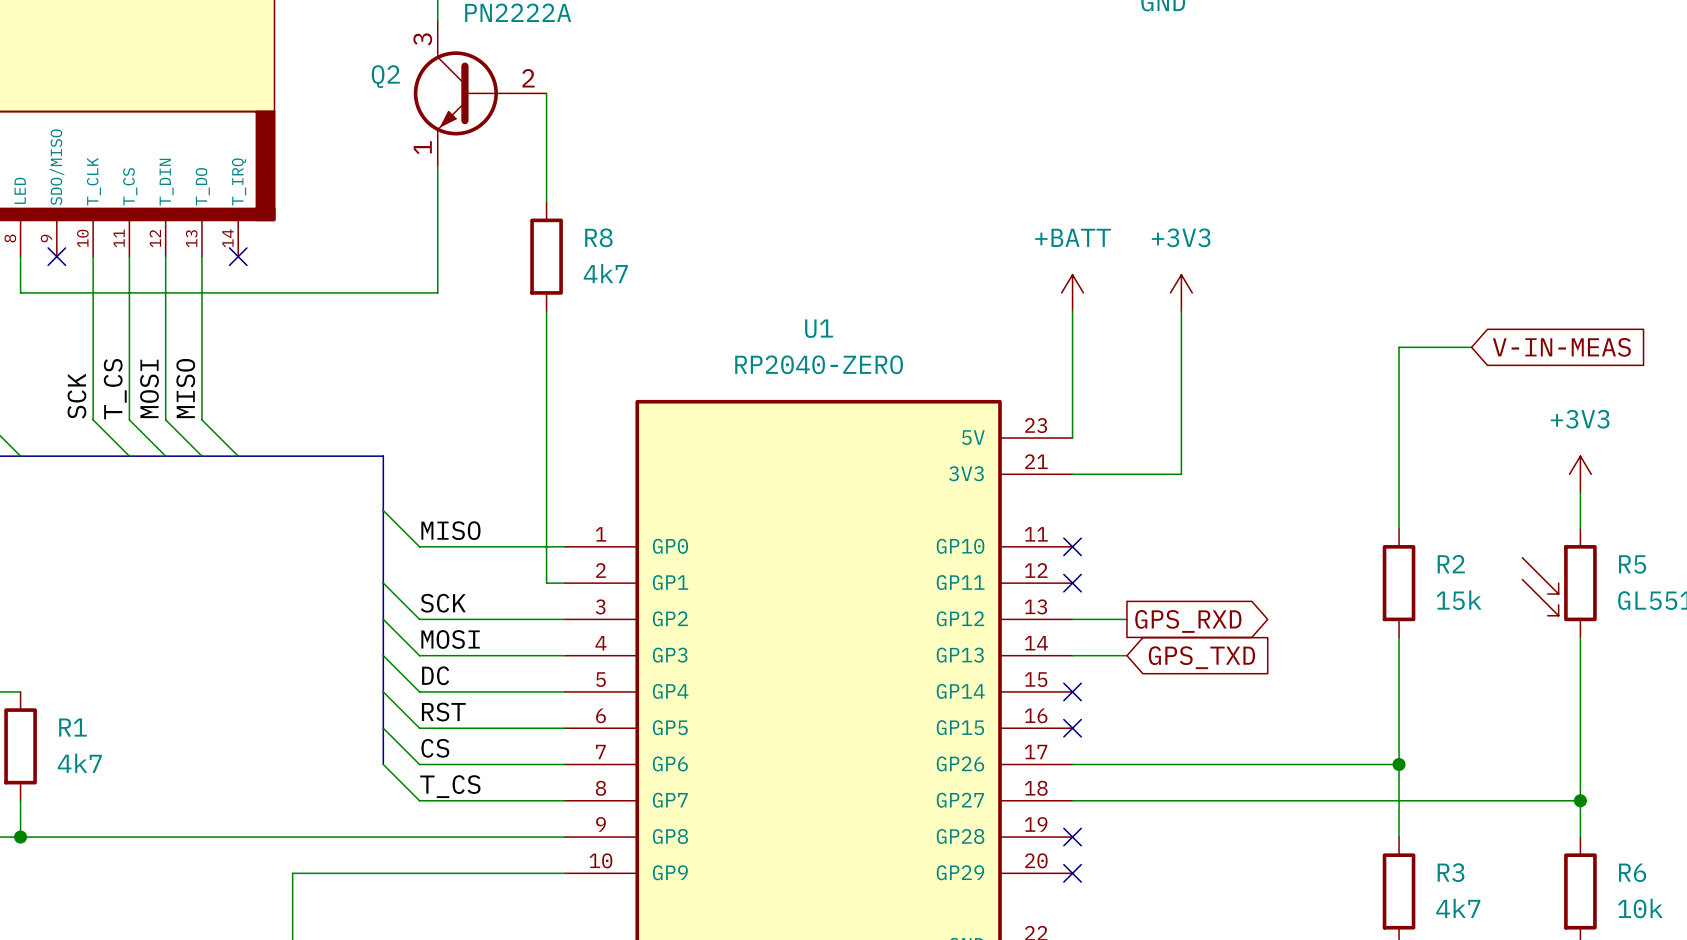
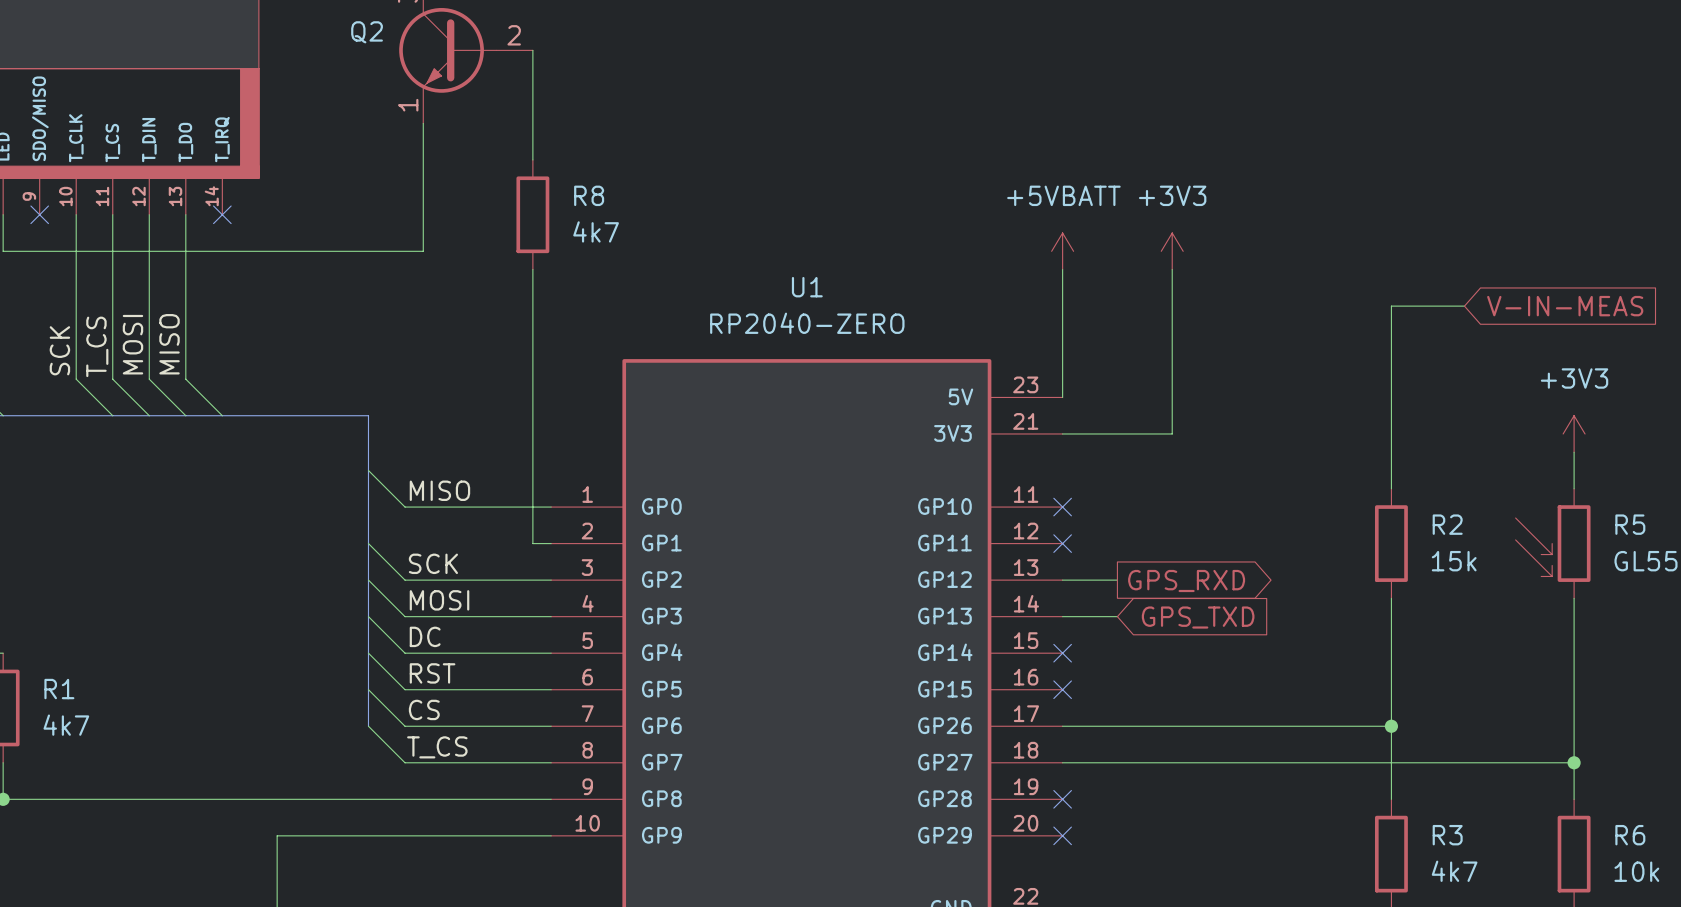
power symbol: +BATT (1072, 292) -> +5VBATT (1062, 251)

